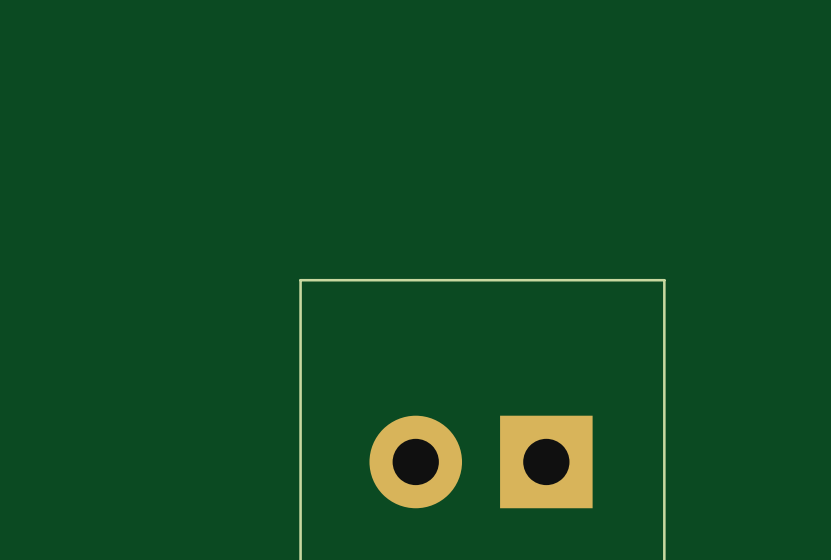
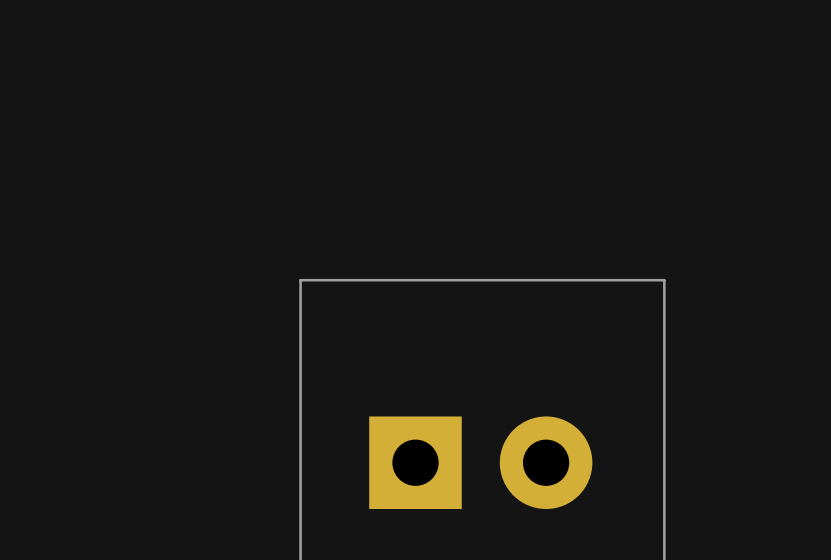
part rotation: 0° (481, 461) -> 180° (480, 462)

